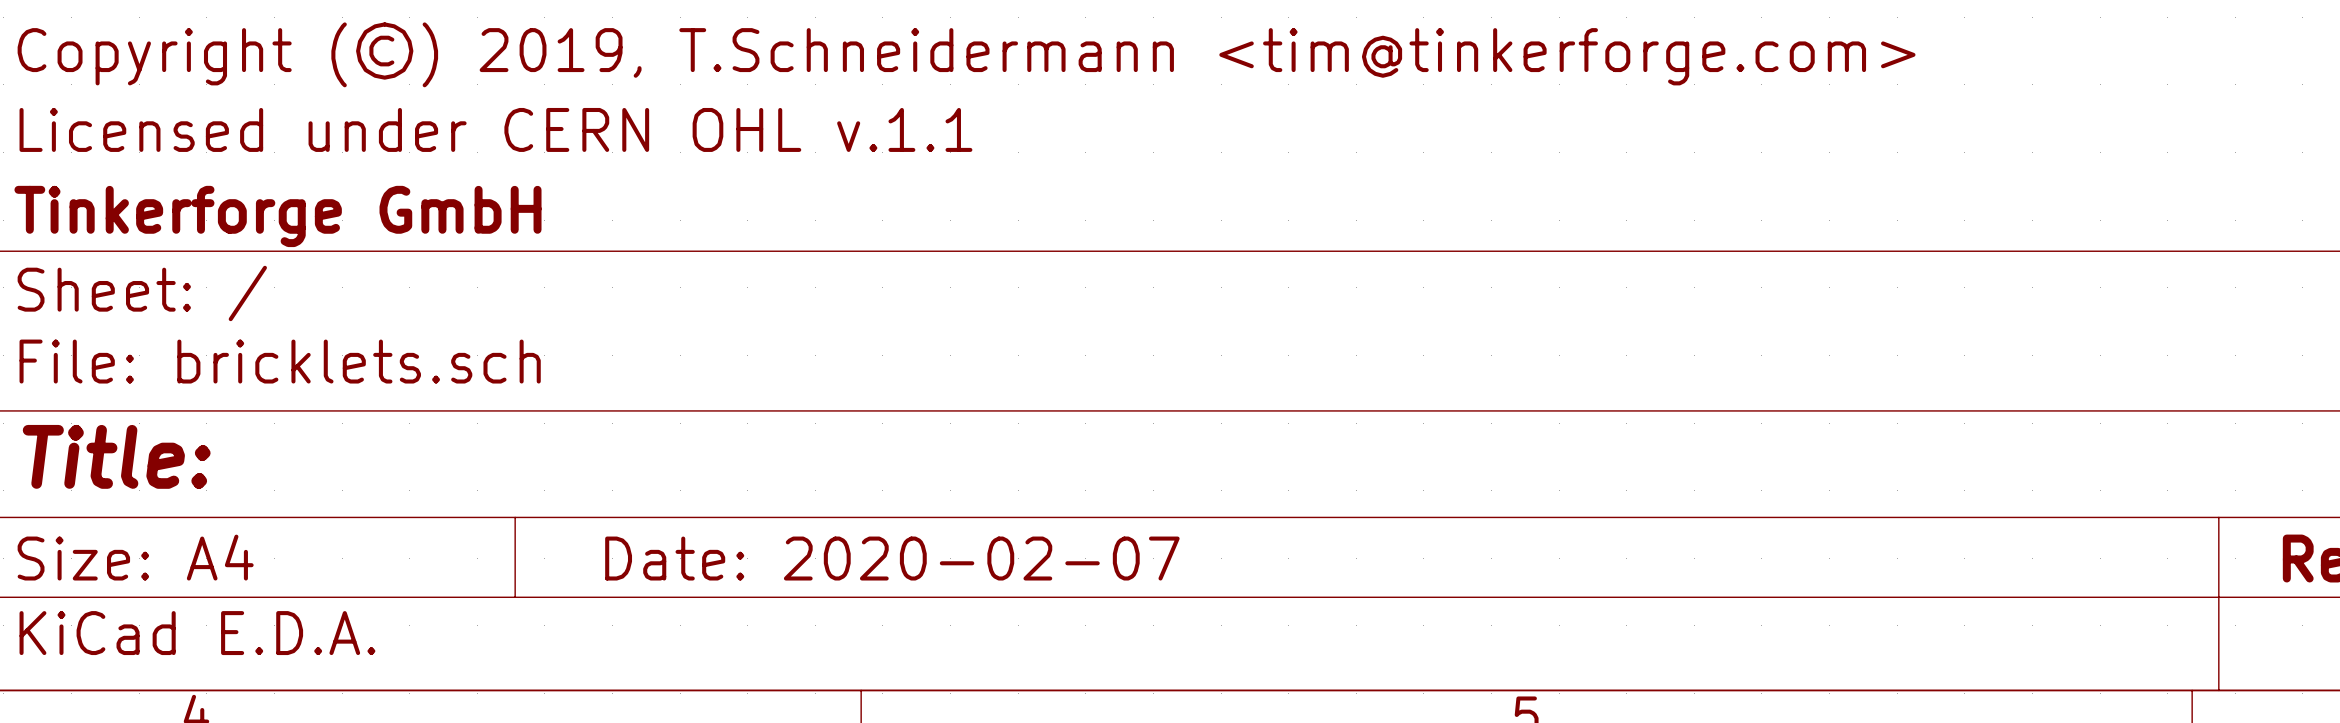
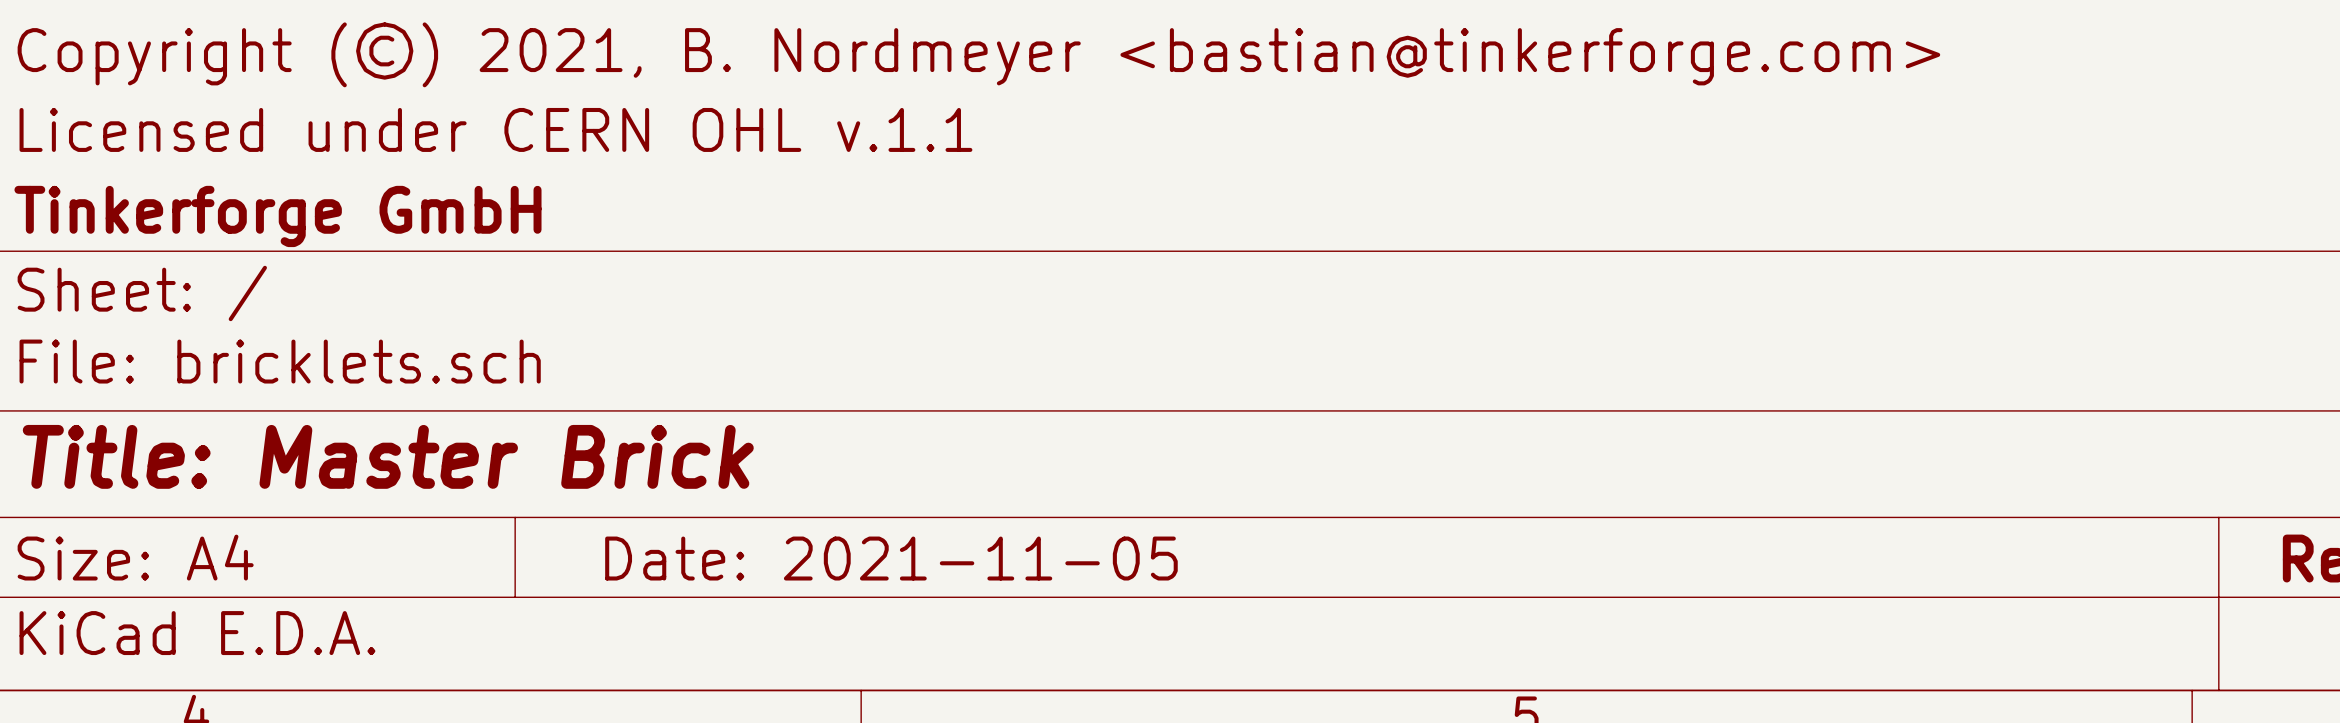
title block: Copyright (©) 2019, T.Schneidermann <tim@tinkerforge.com> (966, 54) -> Copyright (©) 2021, B. Nordmeyer <bastian@tinkerforge.com> (978, 54)
title block: Title: (116, 456) -> Title: Master Brick (388, 456)
title block: Date: 2020-02-07 (892, 558) -> Date: 2021-11-05 (891, 558)

